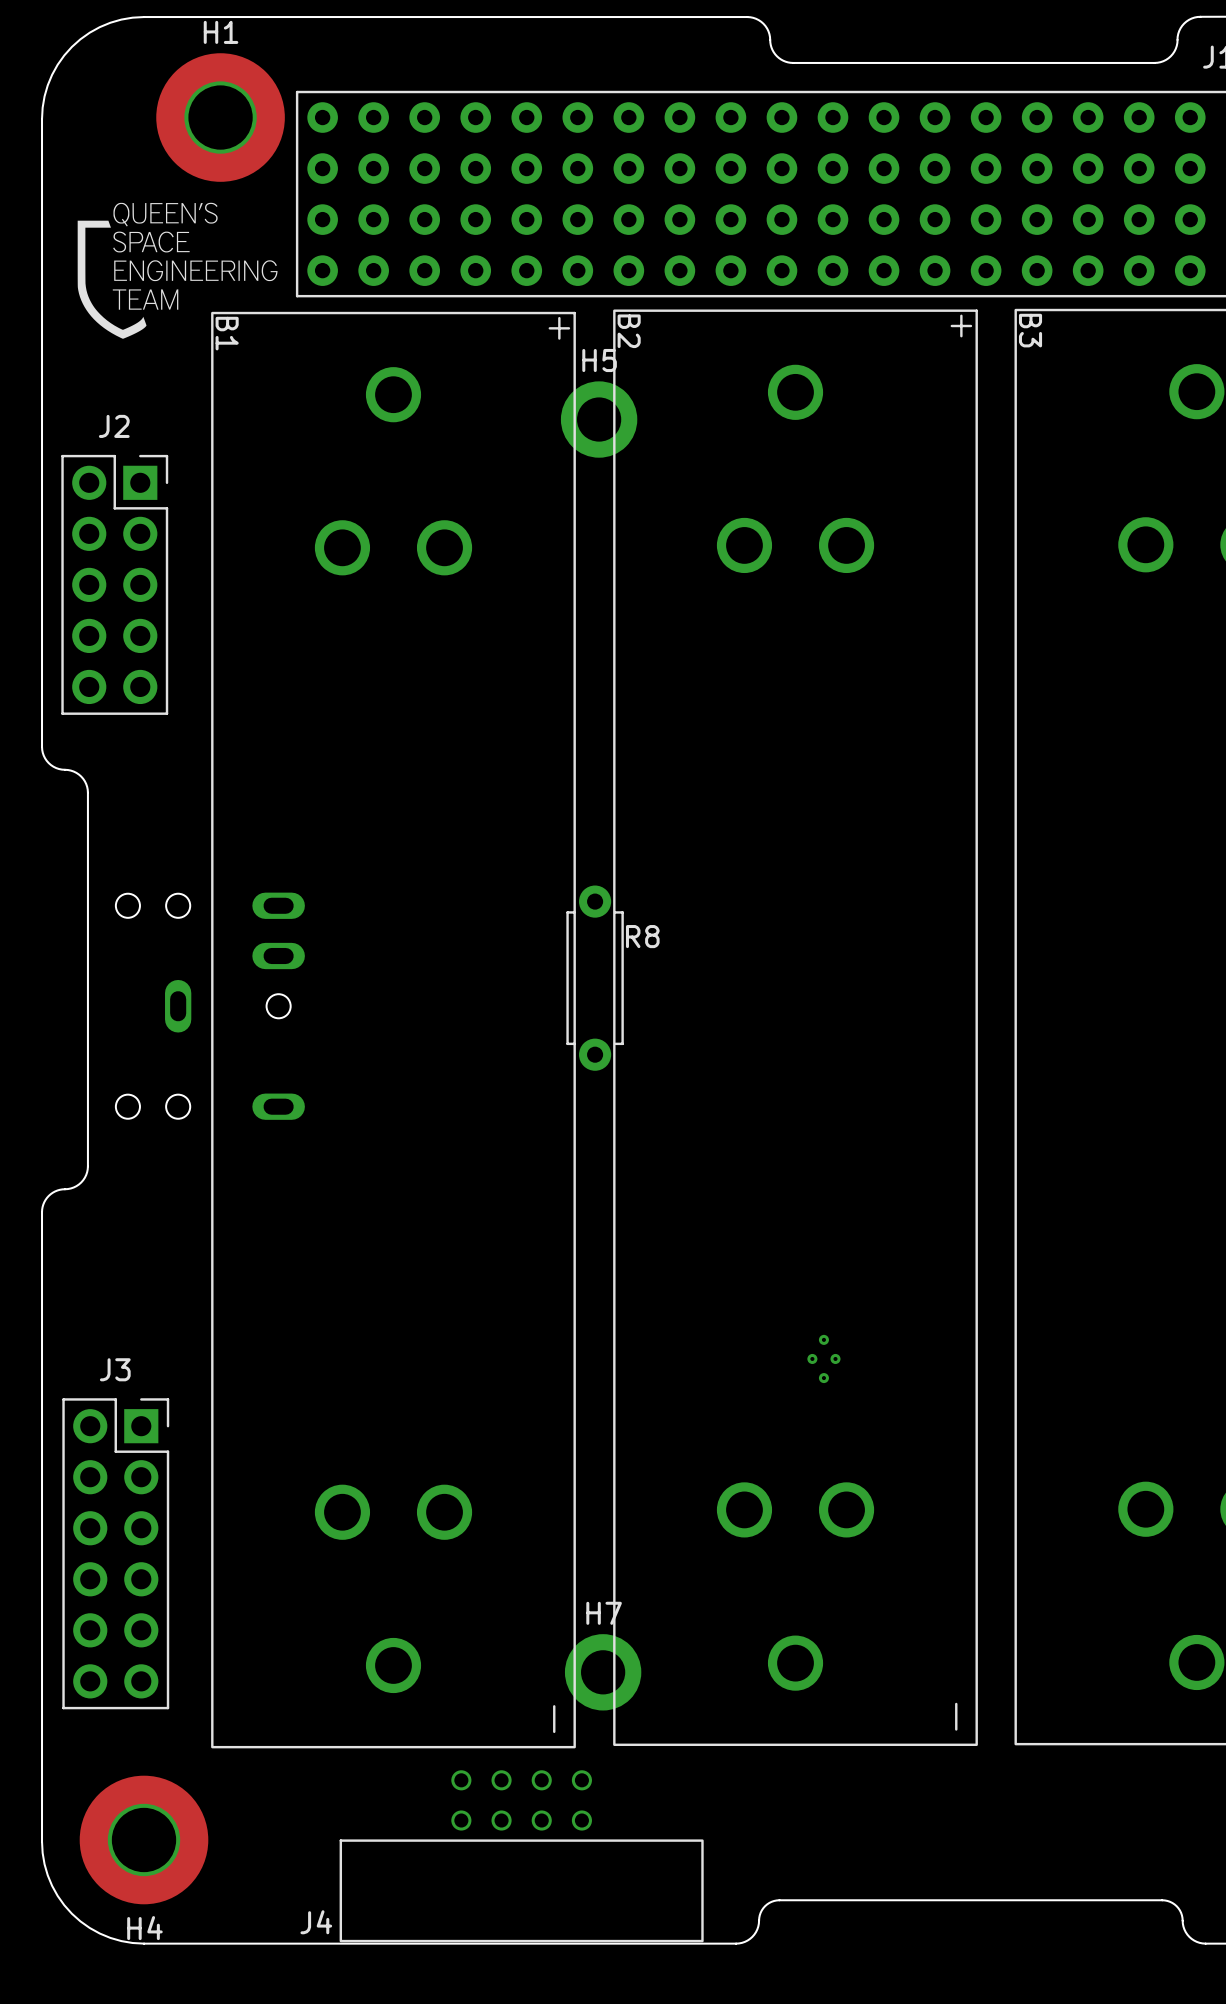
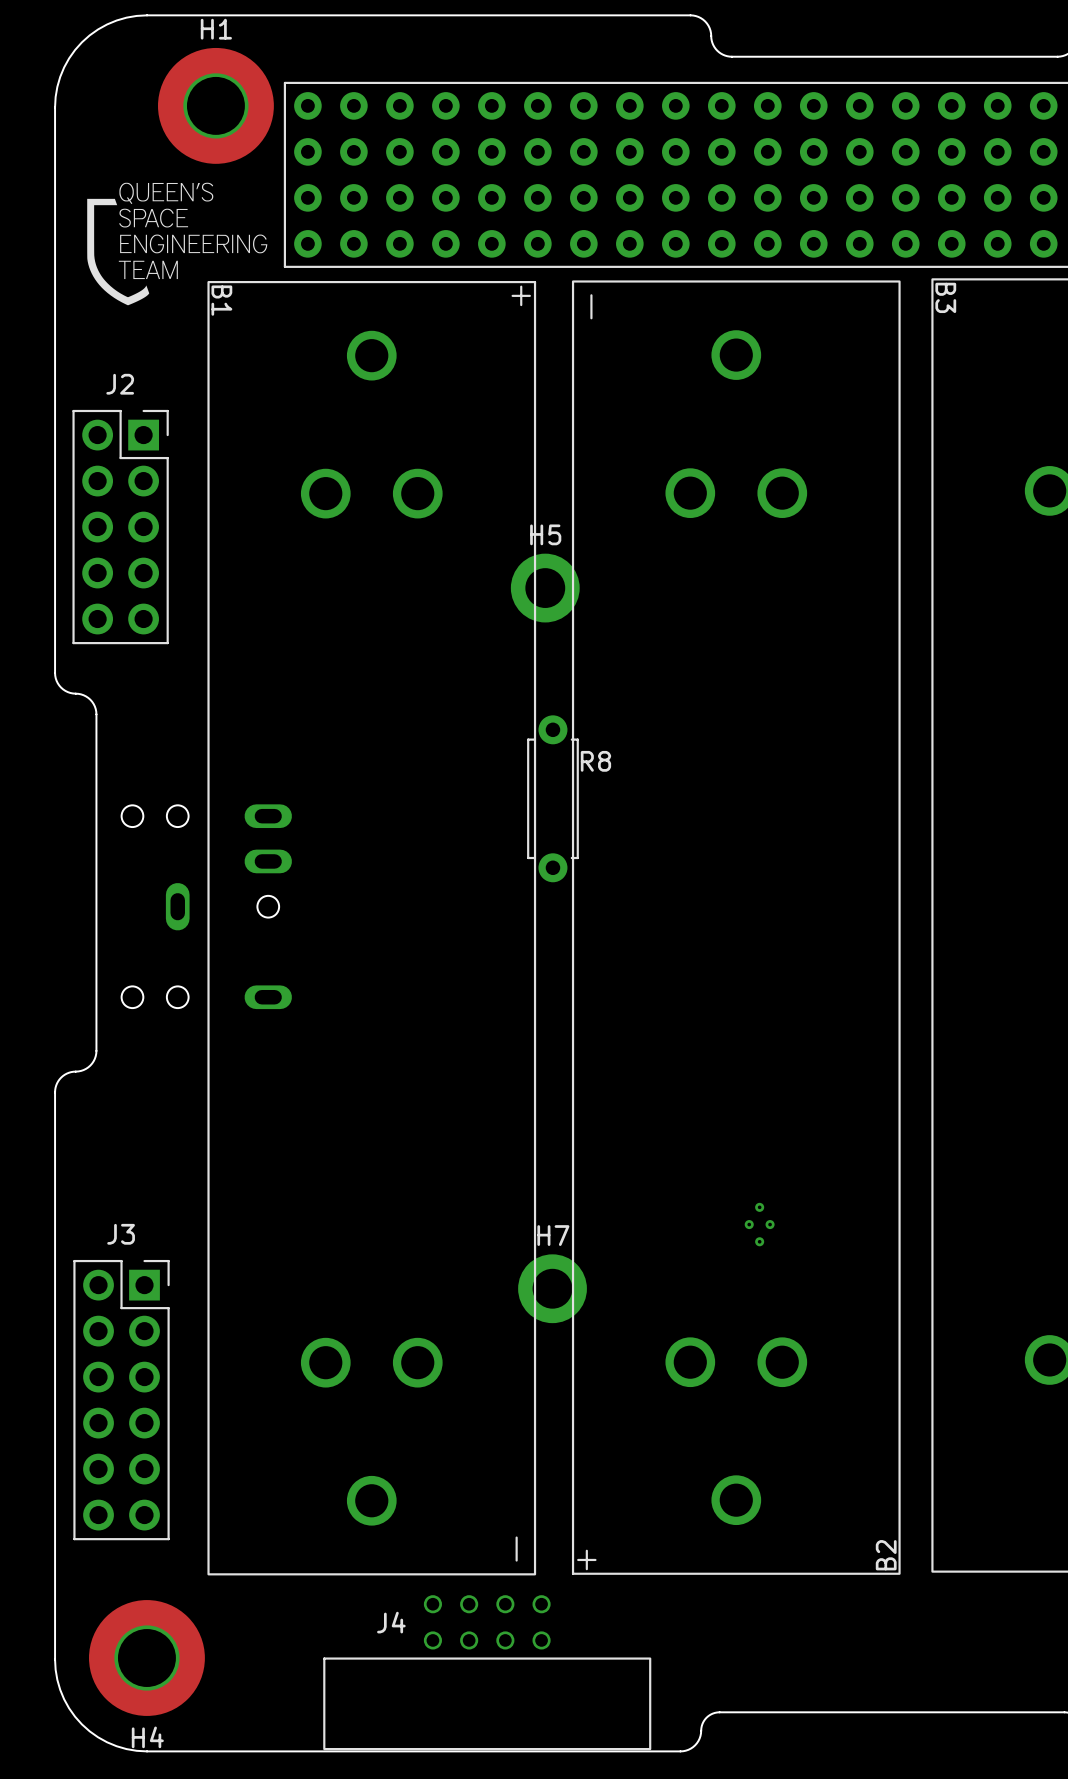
H5 position: (599, 419) -> (545, 588)
R8 position: (595, 978) -> (552, 798)
B2 rotation: 0° (795, 1027) -> 180° (736, 927)
H7 position: (603, 1672) -> (552, 1288)
J4 name position: J4 (316, 1922) -> J4 (391, 1622)

